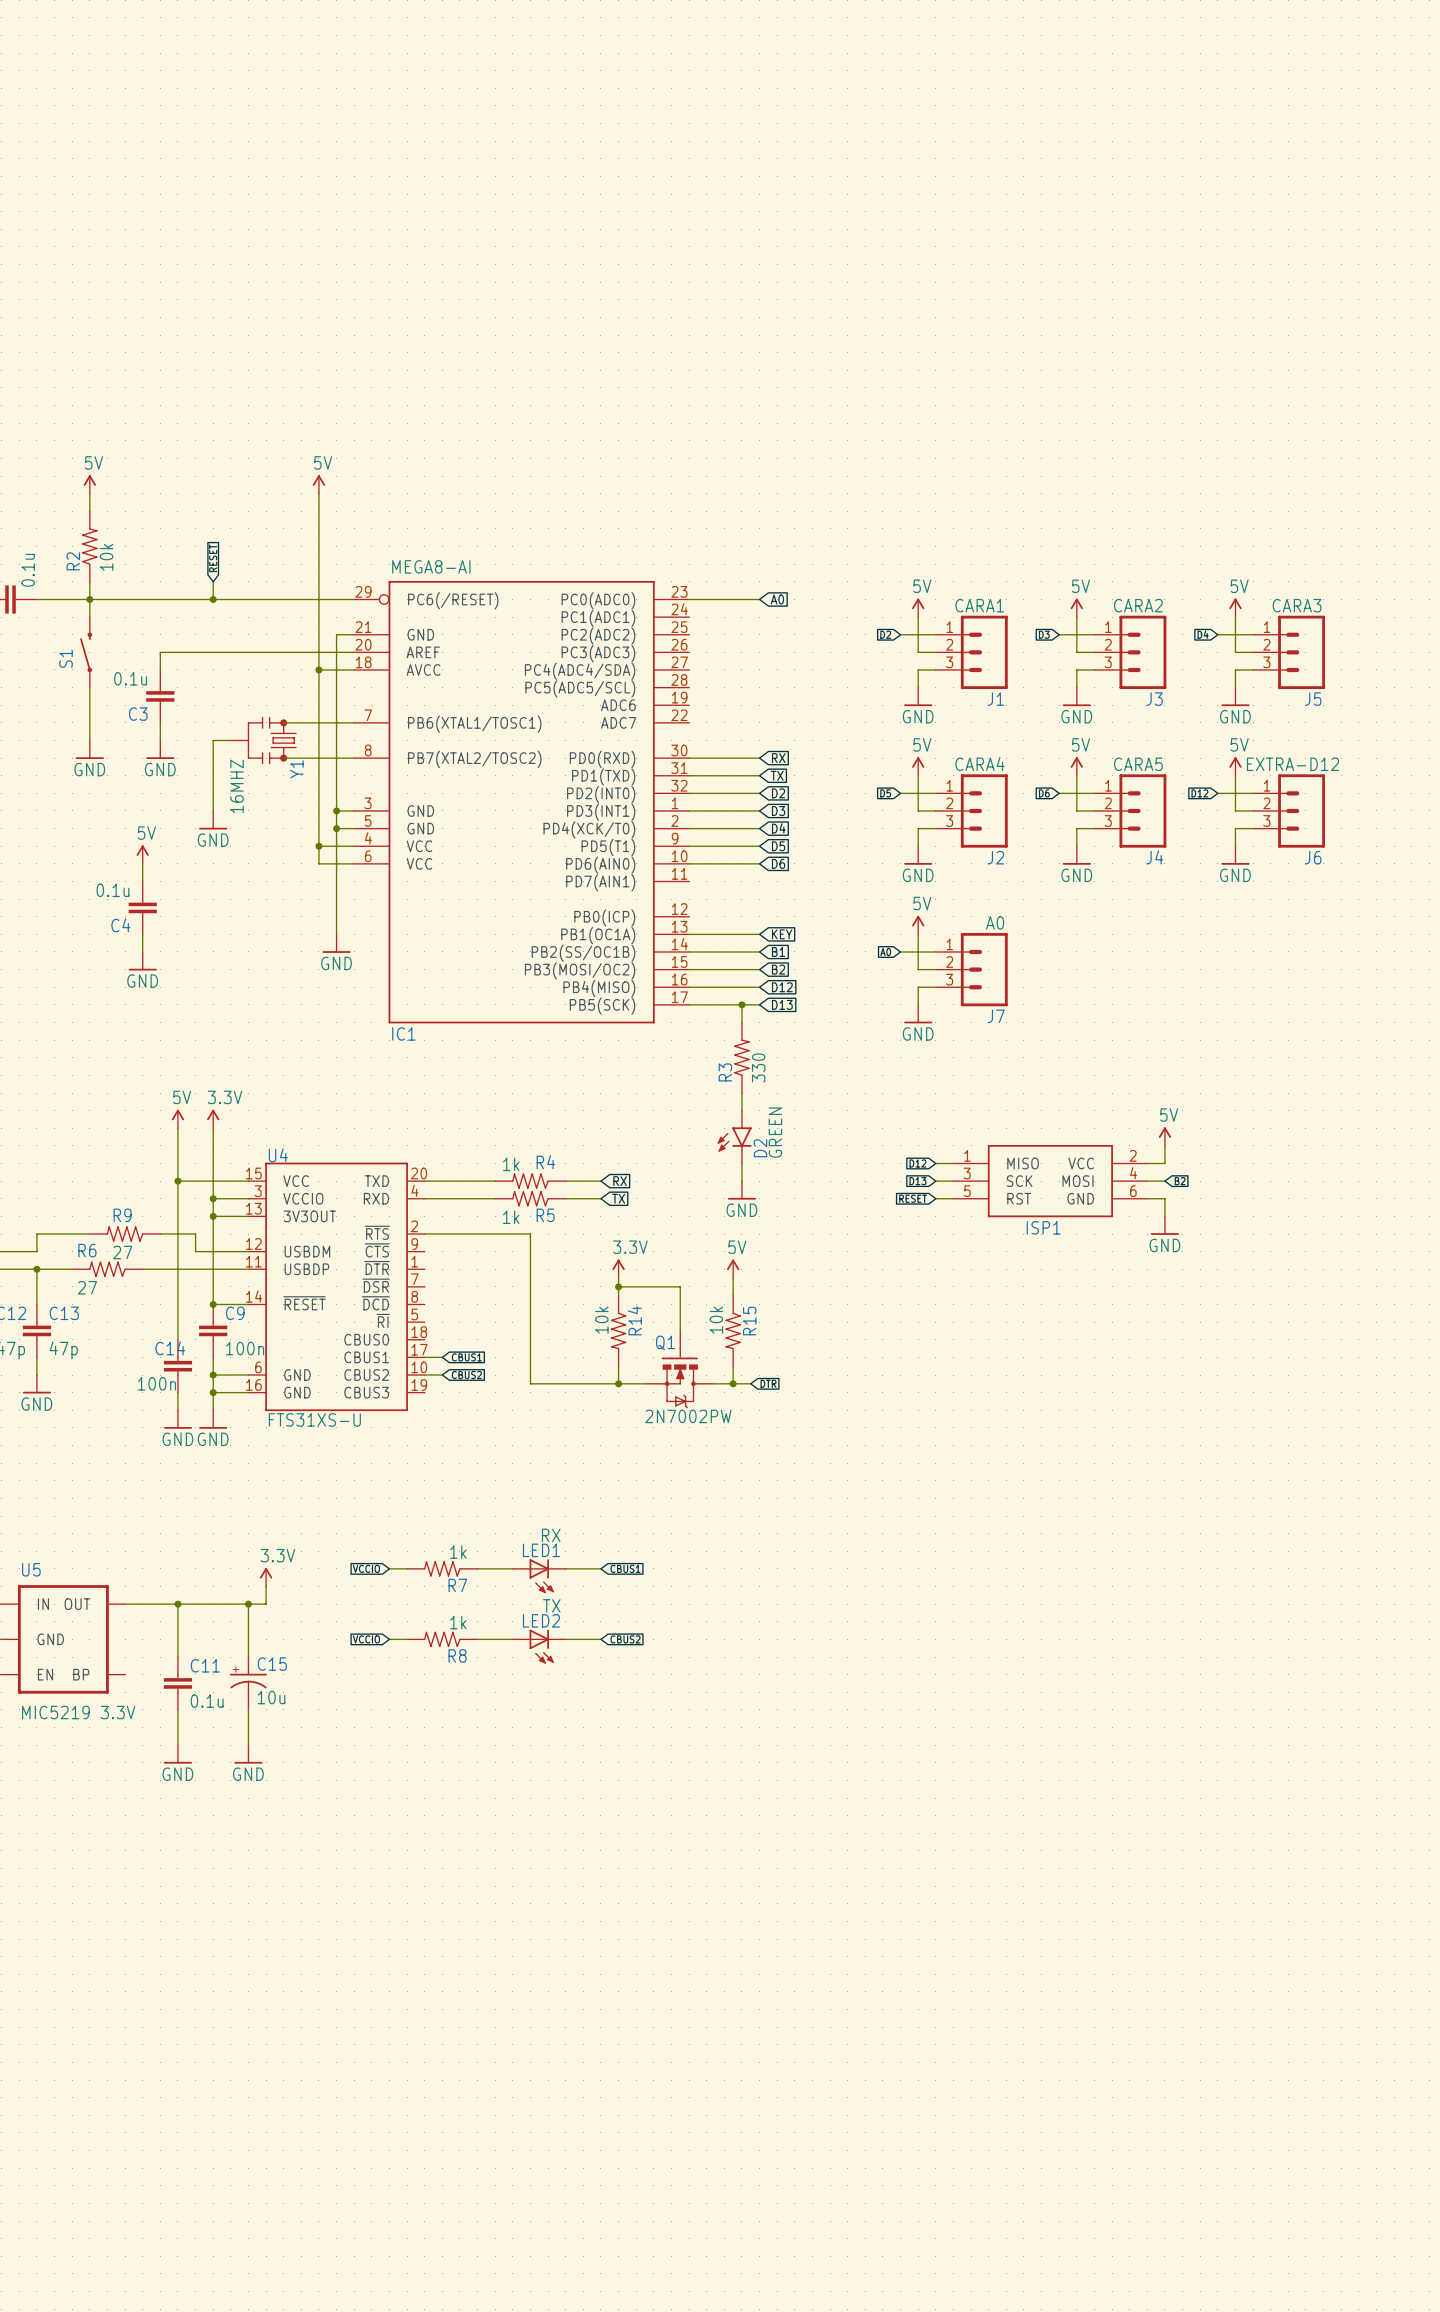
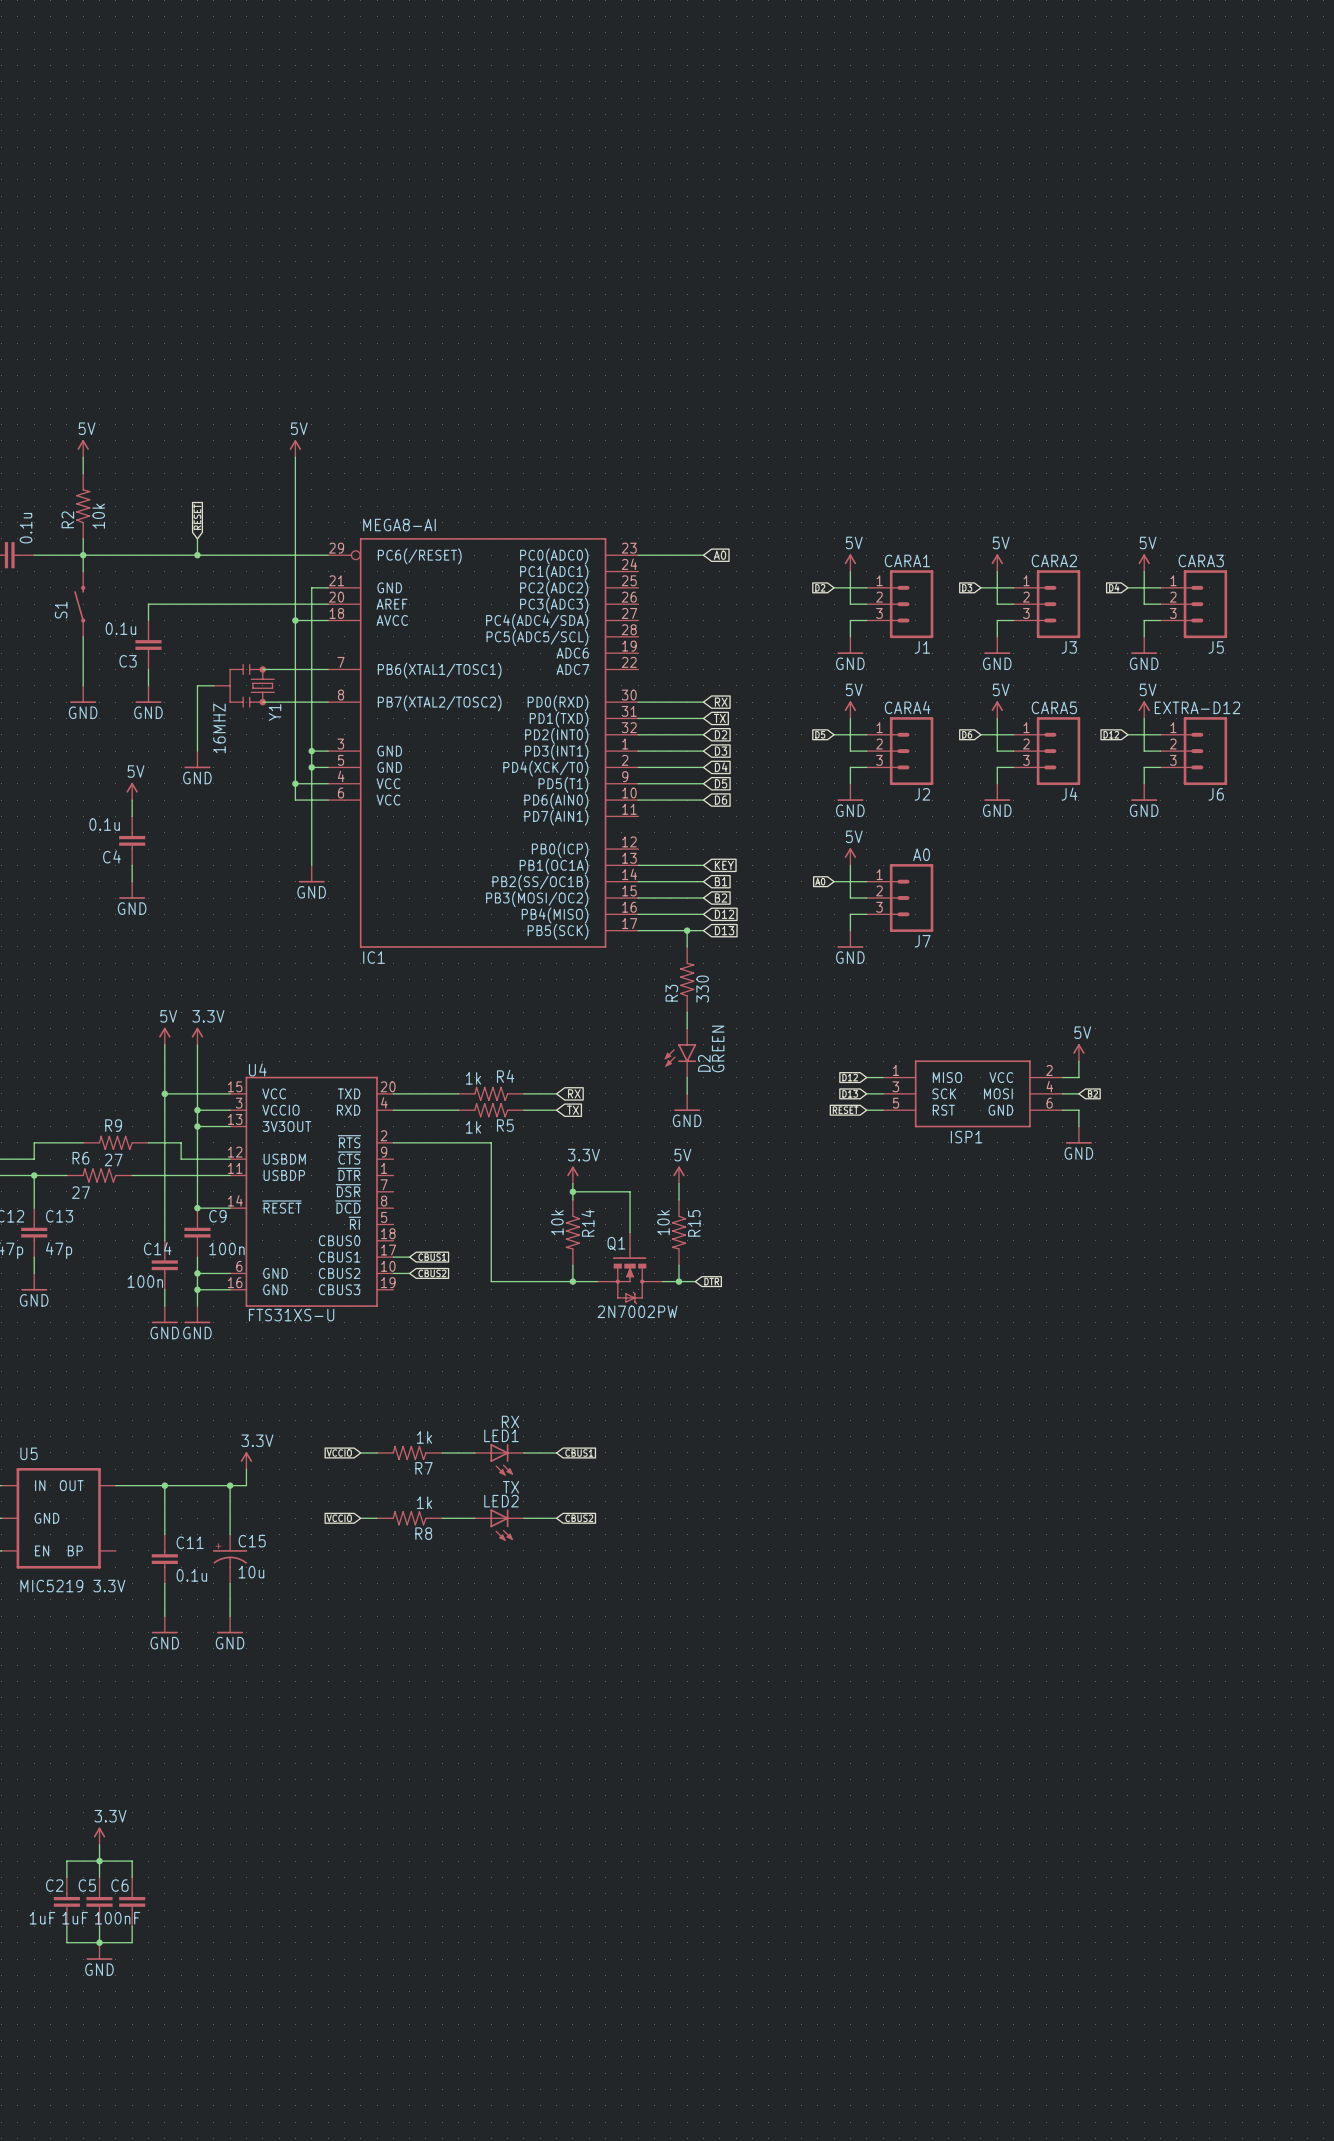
power symbol: none -> 3.3V (99, 1836)
wire: none -> (99, 1844) (99, 1877)
junction: none -> (99, 1861)
wire: none -> (66, 1877) (66, 1861) (132, 1861) (132, 1877)
C2: none -> 1uF (66, 1901)
C5: none -> 1uF (99, 1901)
C6: none -> 100nF (132, 1901)
wire: none -> (66, 1926) (66, 1942) (132, 1942) (132, 1926)
wire: none -> (99, 1926) (99, 1942)
junction: none -> (99, 1942)
power symbol: none -> GND (99, 1951)

